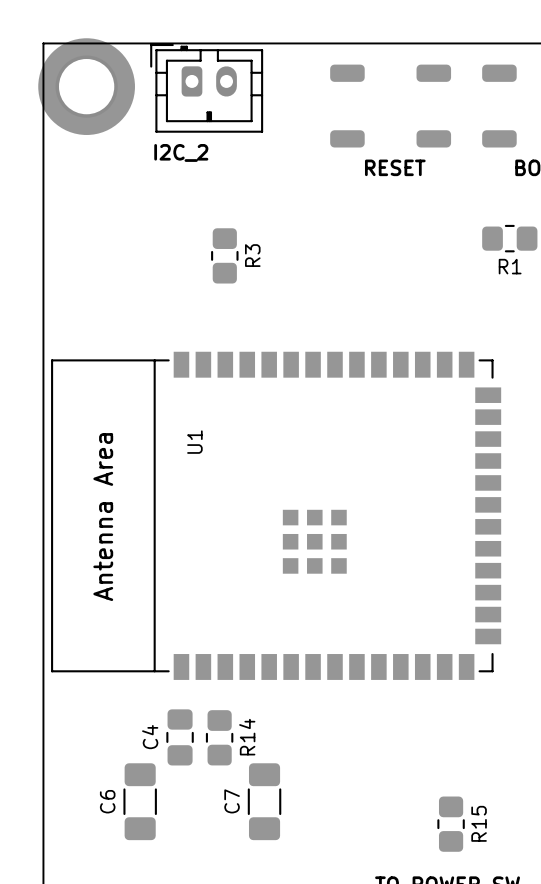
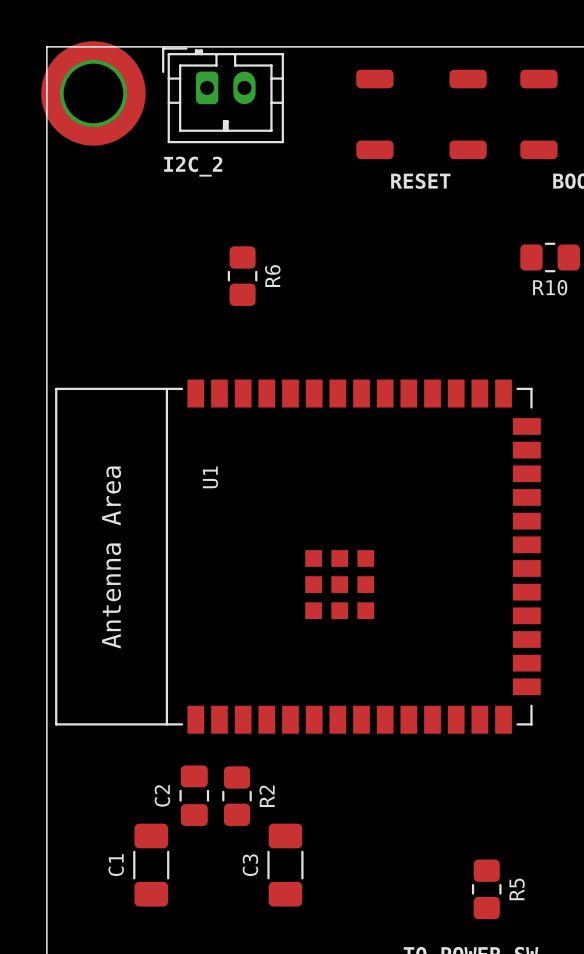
R3 name: R3 (252, 255) -> R6 (272, 276)
R1 name: R1 (510, 266) -> R10 (550, 287)
C4 name: C4 (150, 737) -> C2 (162, 795)
R14 name: R14 (247, 737) -> R2 (267, 796)
C6 name: C6 (107, 801) -> C1 (116, 865)
C7 name: C7 (232, 801) -> C3 (250, 865)
R15 name: R15 (479, 823) -> R5 (517, 889)

